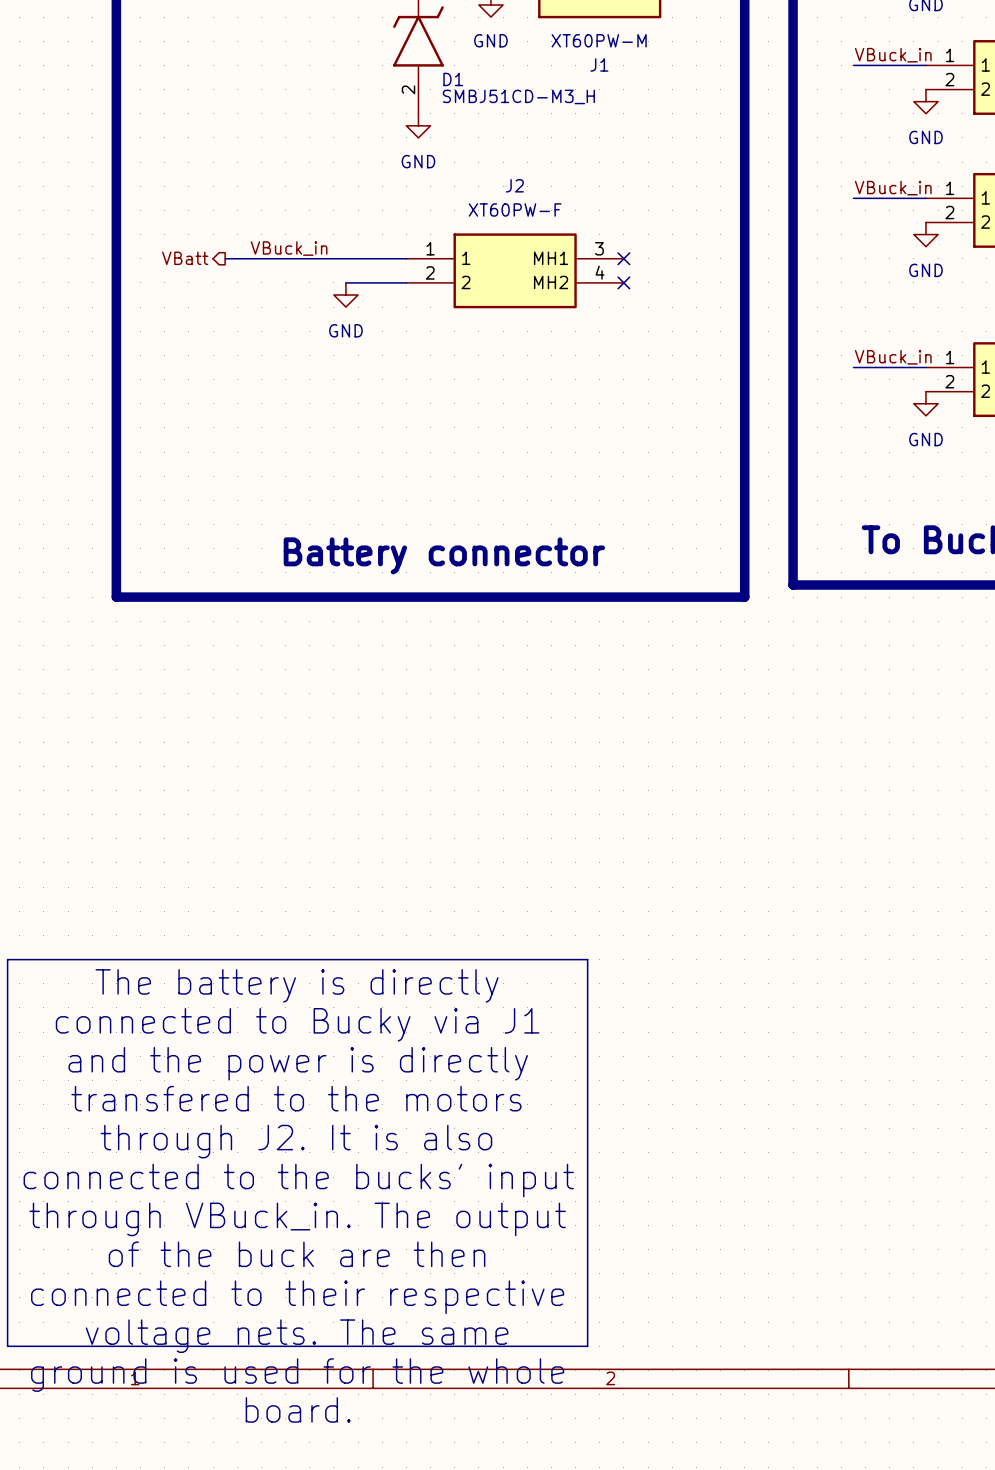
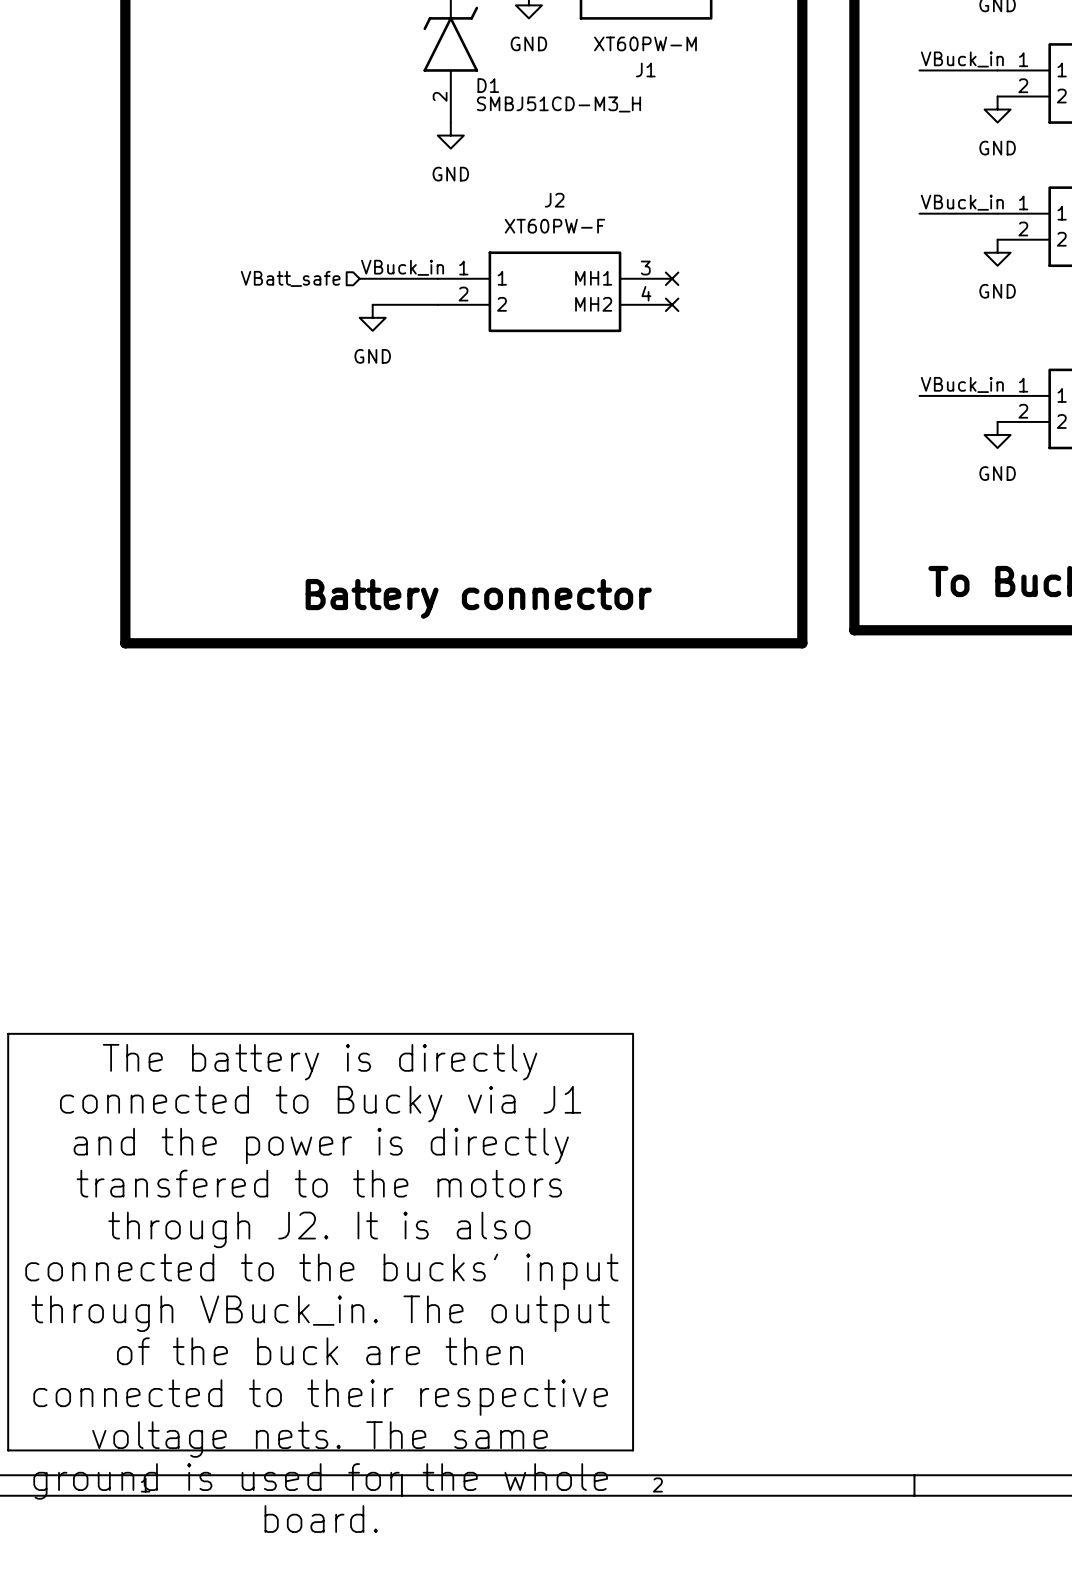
label position: VBuck_in (289, 248) -> VBuck_in (402, 267)
hierarchical label shape: output (185, 258) -> input (290, 278)
hierarchical label: VBatt (185, 258) -> VBatt_safe (290, 278)
wire: (225, 258) (333, 258) -> none

